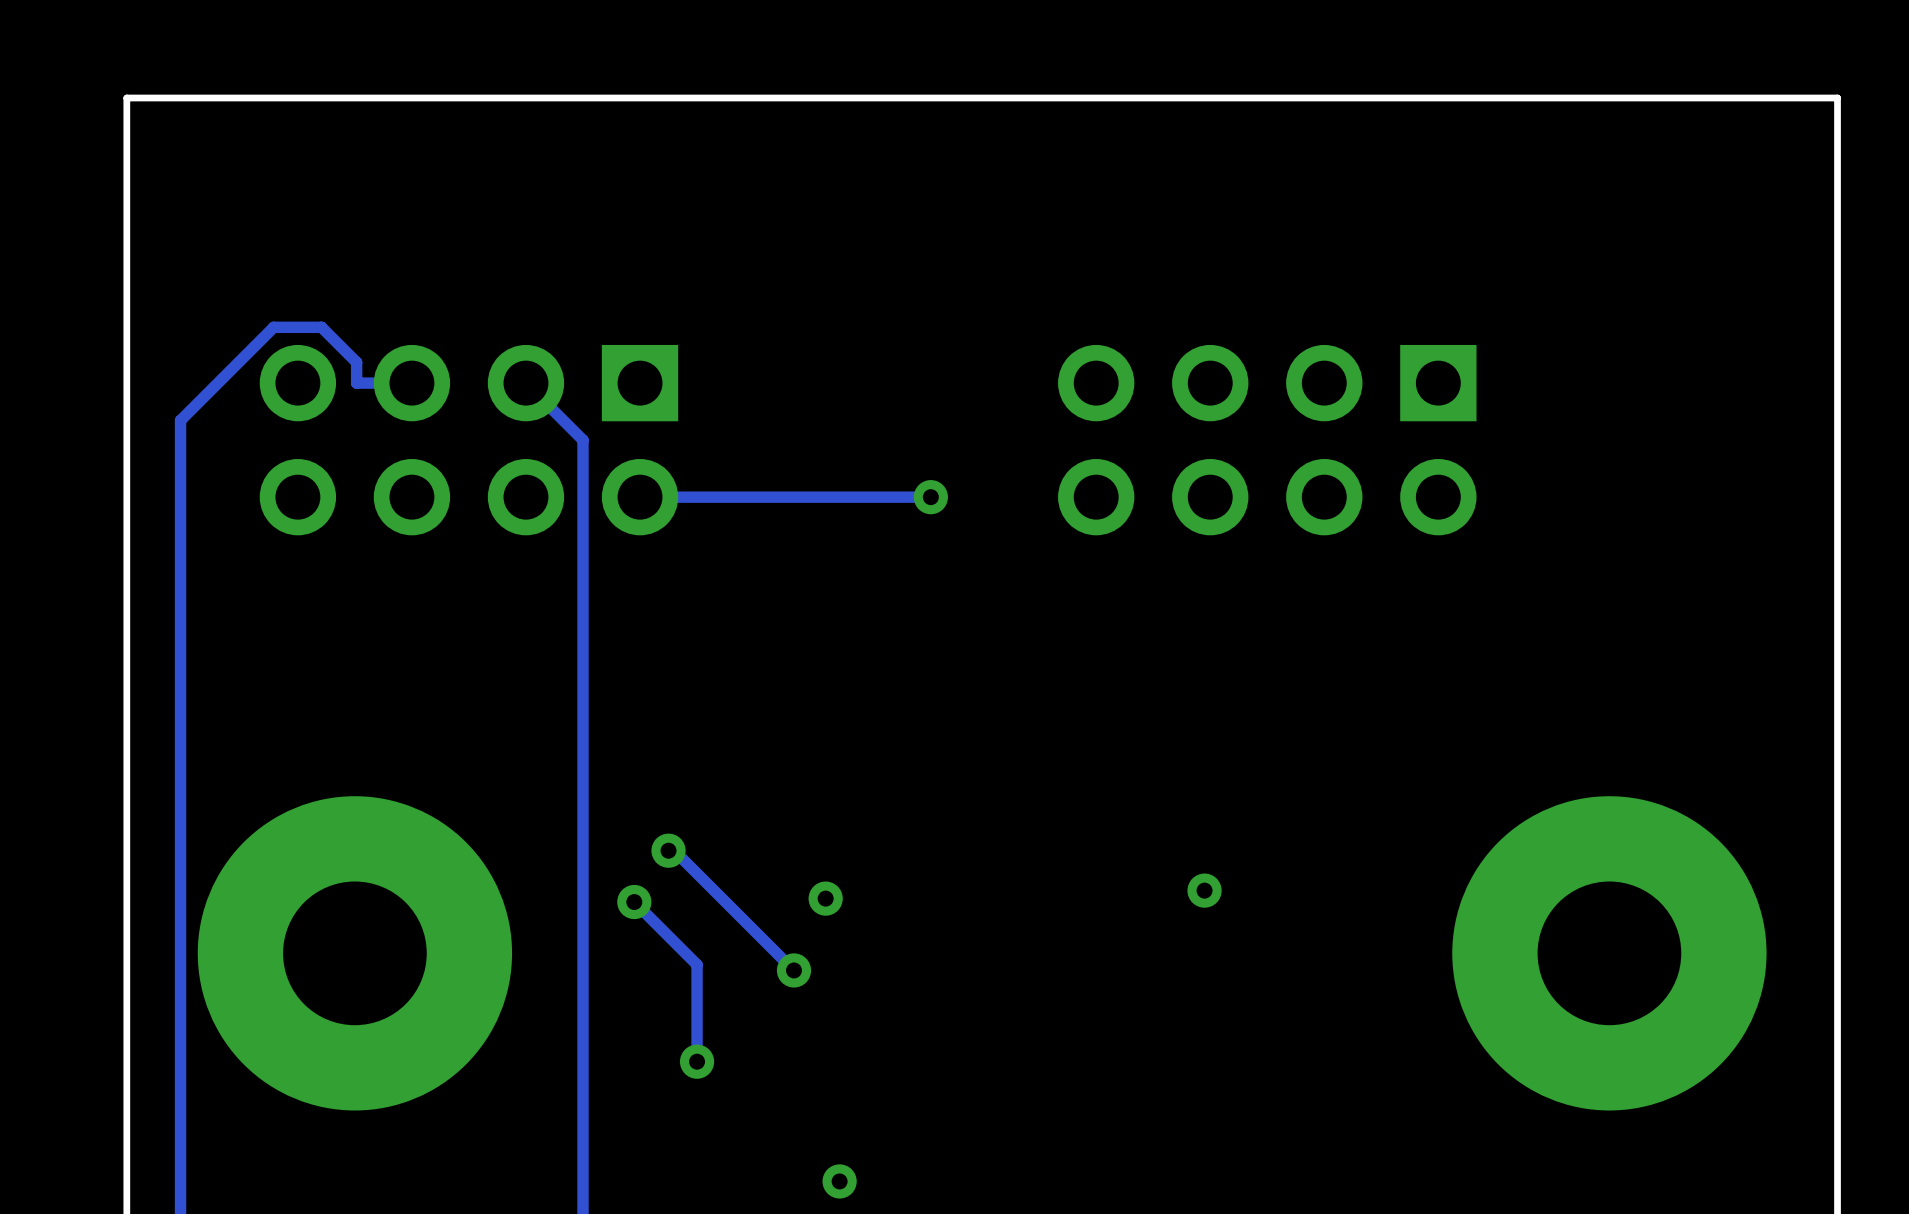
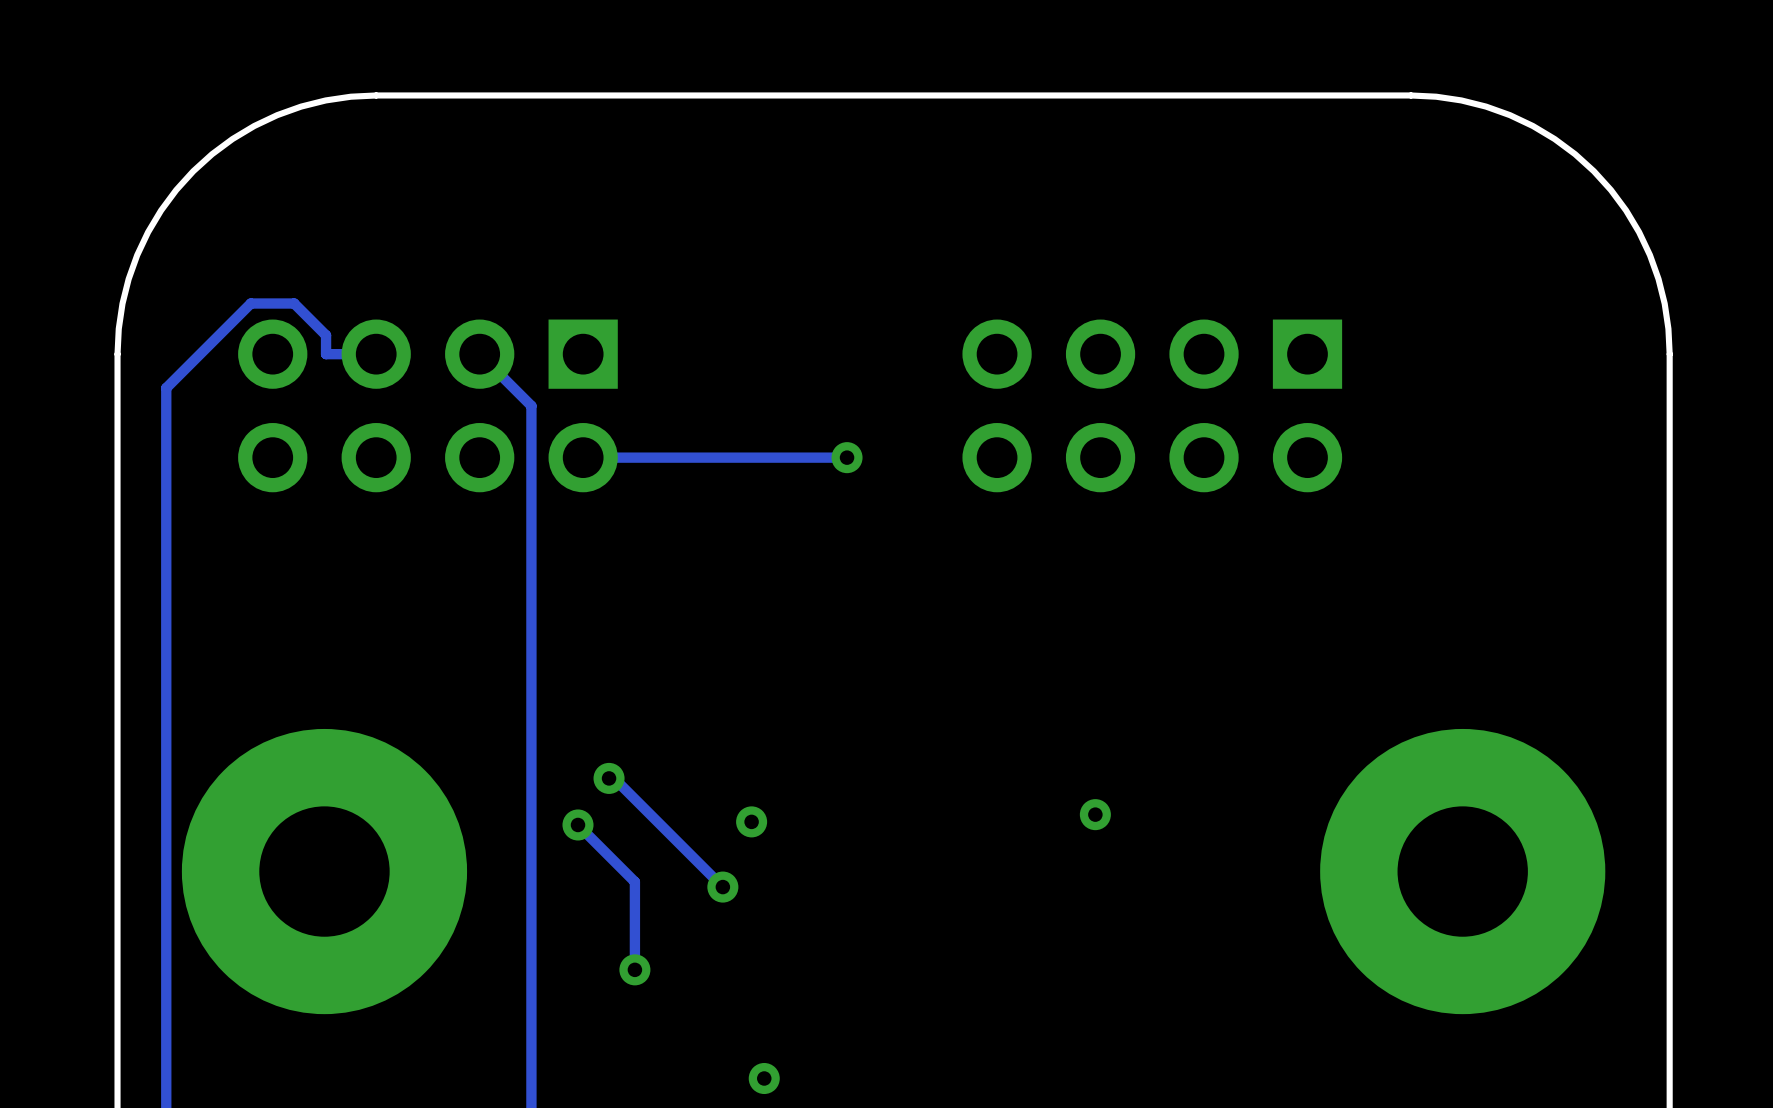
board edge: (411, 98) (126, 98) (126, 383) -> (376, 95) (325, 100) (277, 115) (232, 139) (193, 171) (161, 210) (137, 255) (122, 303) (117, 354)
board edge: (1552, 98) (1837, 98) (1837, 383) -> (1410, 95) (1461, 100) (1509, 115) (1554, 139) (1593, 171) (1626, 210) (1649, 255) (1664, 303) (1669, 354)

